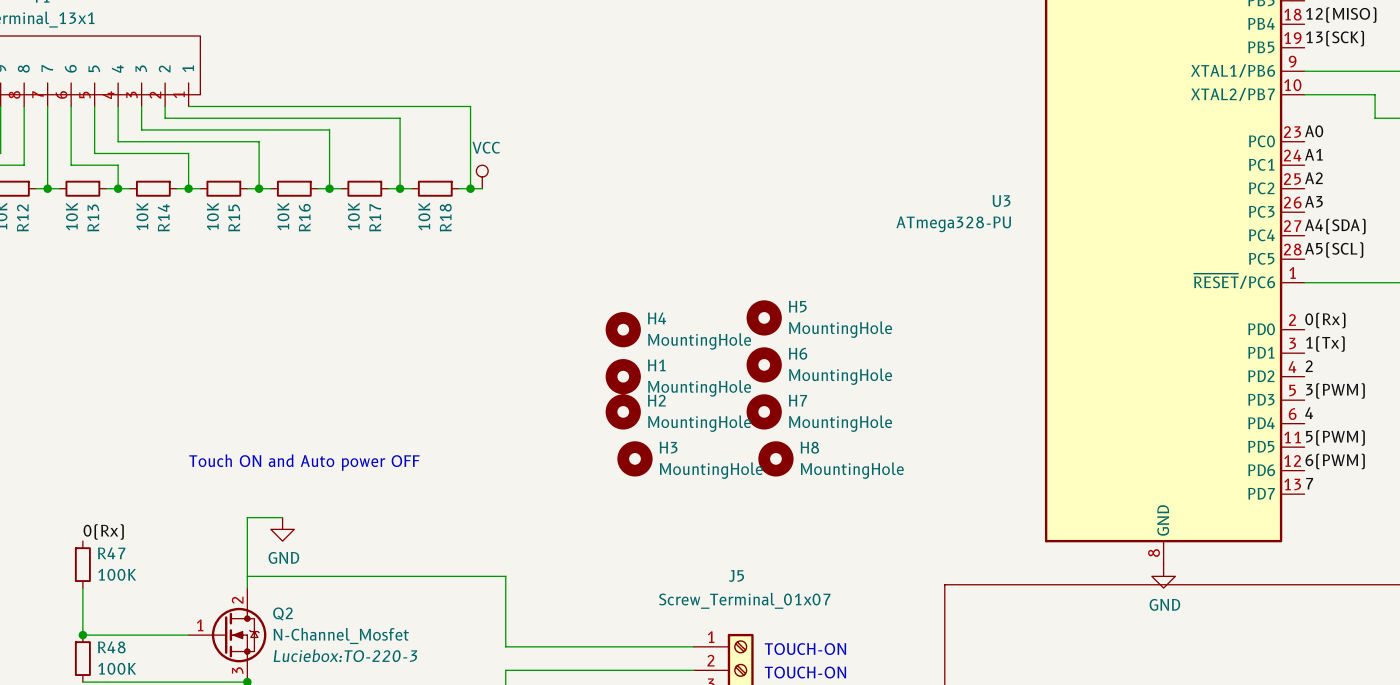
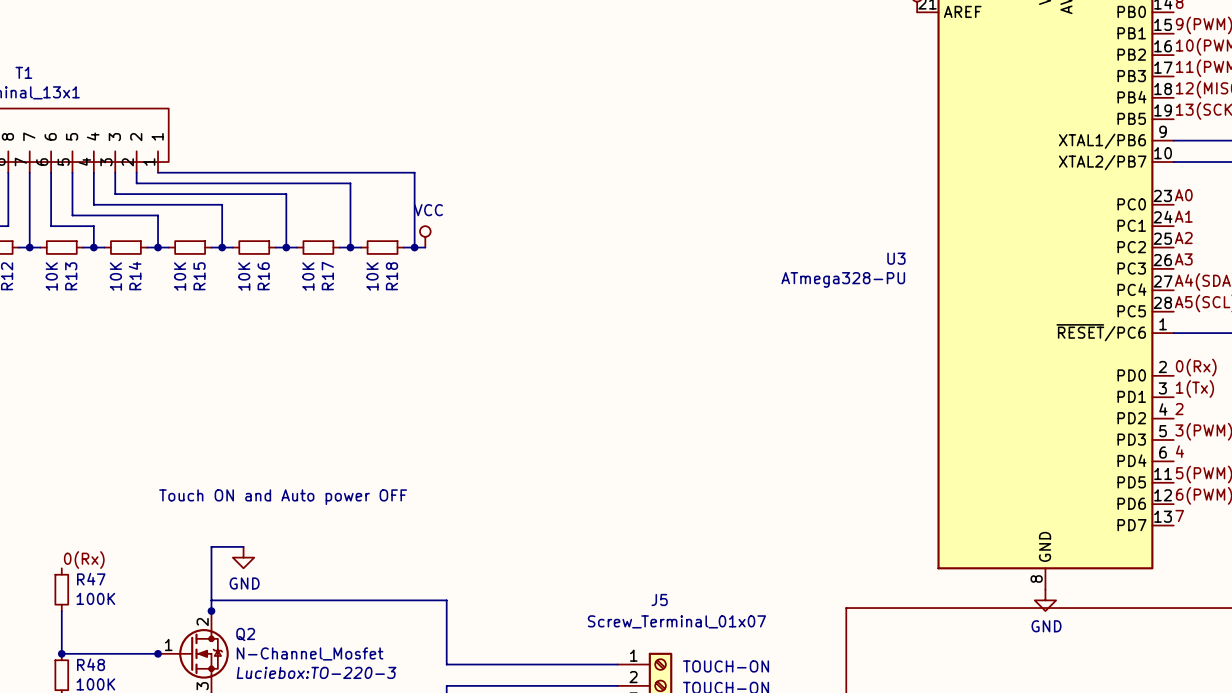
H5: MountingHole (764, 317) -> none
H4: MountingHole (623, 329) -> none
H6: MountingHole (764, 364) -> none
H1: MountingHole (623, 376) -> none
H2: MountingHole (623, 411) -> none
H7: MountingHole (764, 411) -> none
H3: MountingHole (634, 458) -> none
H8: MountingHole (775, 458) -> none
junction: none -> (211, 611)
junction: none -> (158, 653)

